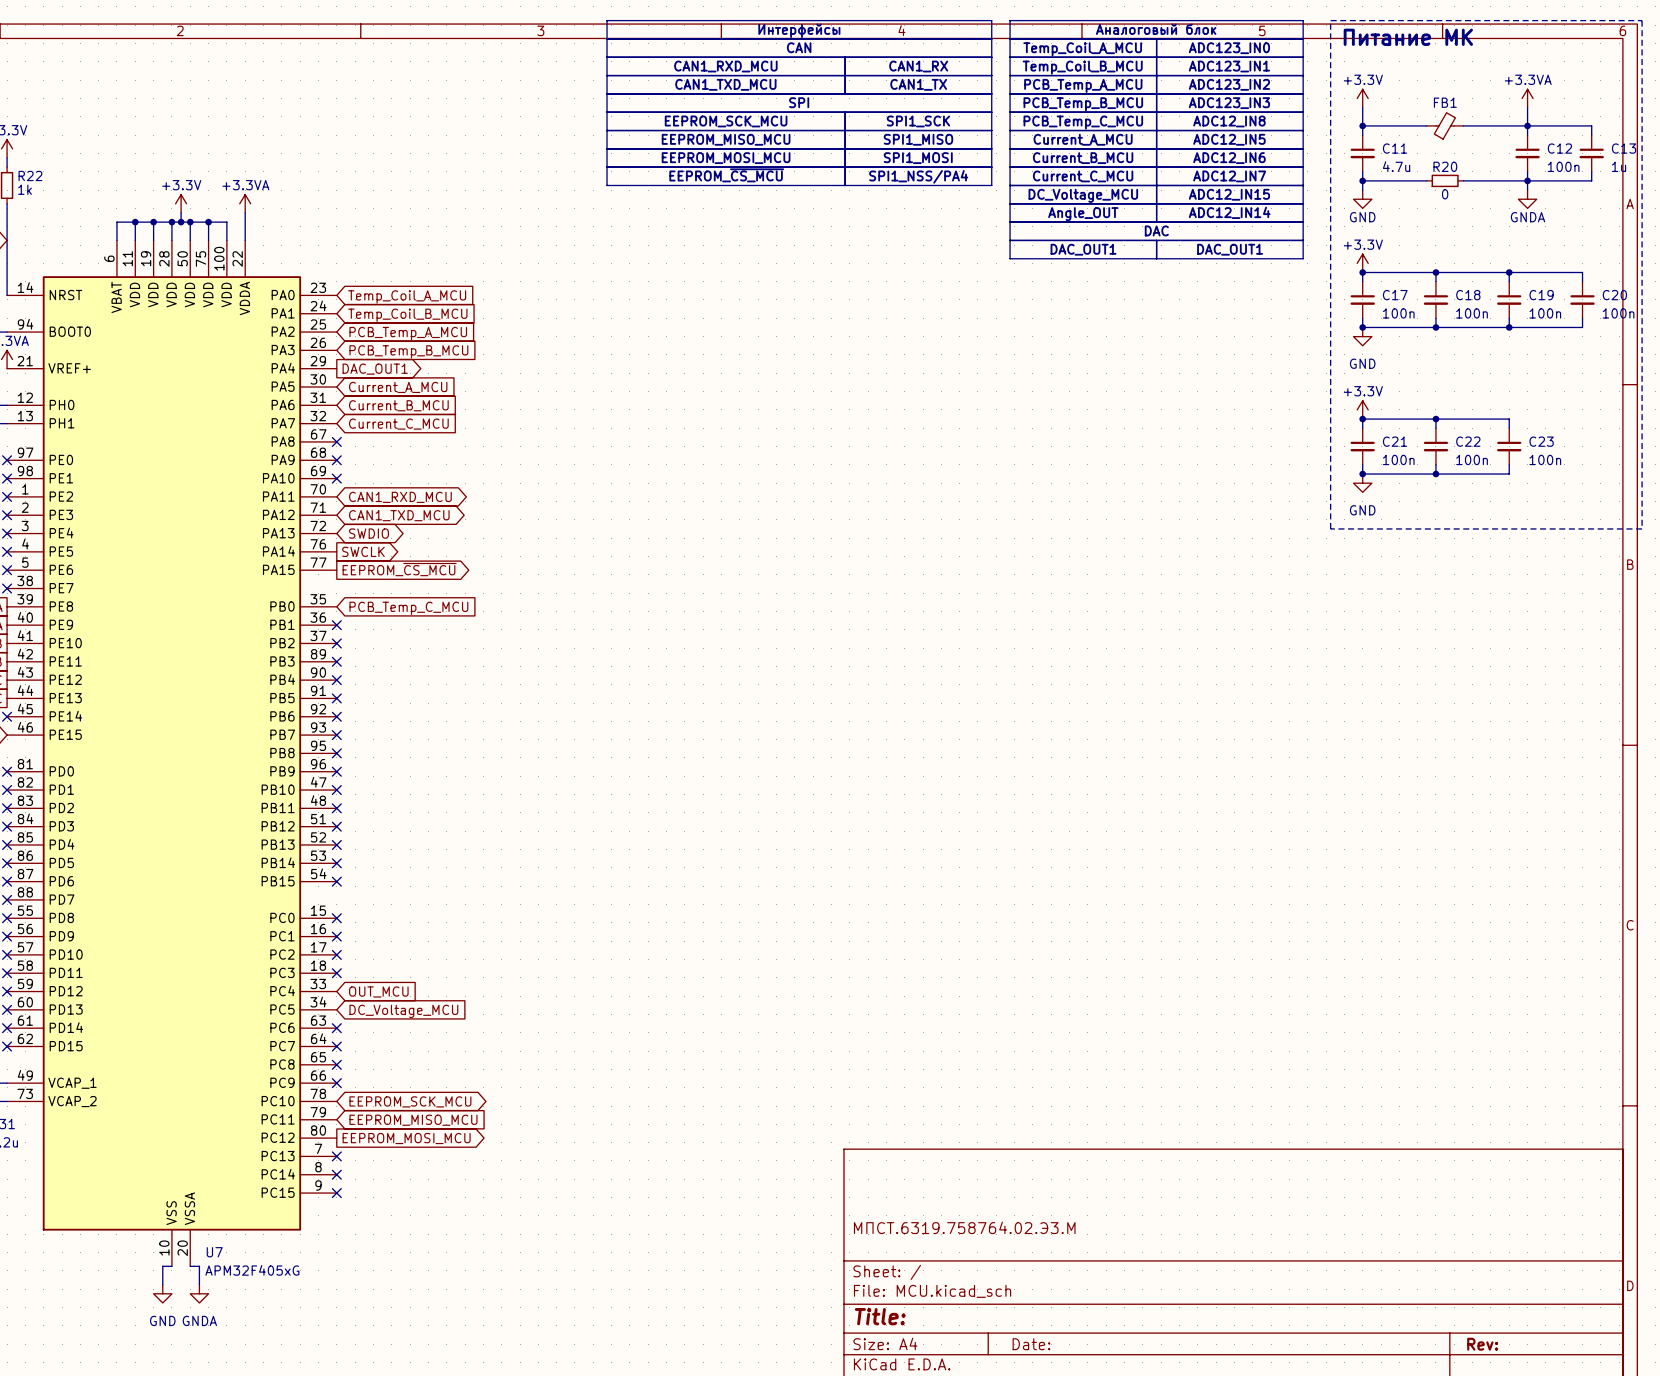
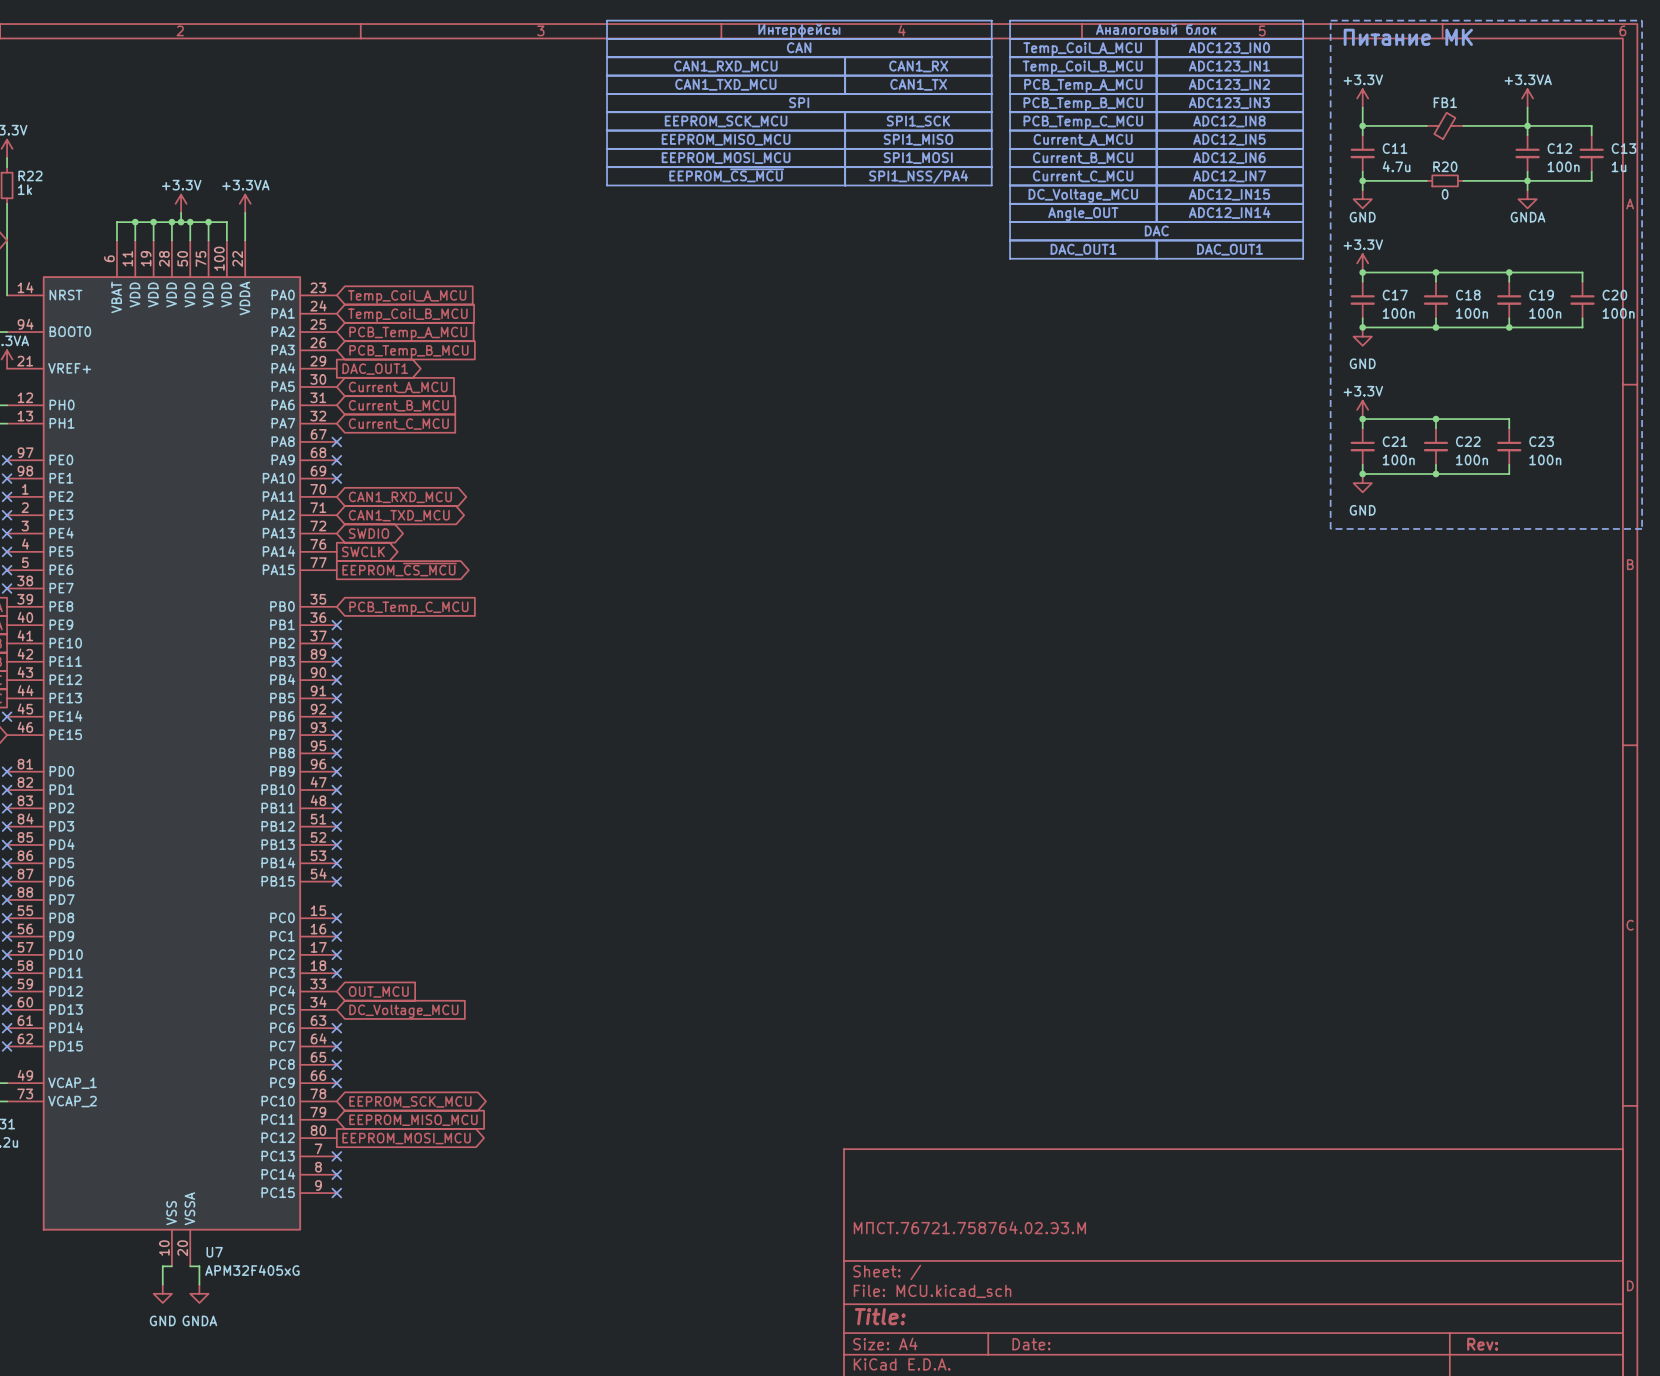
title block: МПСТ.6319.758764.02.Э3.М (964, 1227) -> МПСТ.76721.758764.02.Э3.М (969, 1227)

